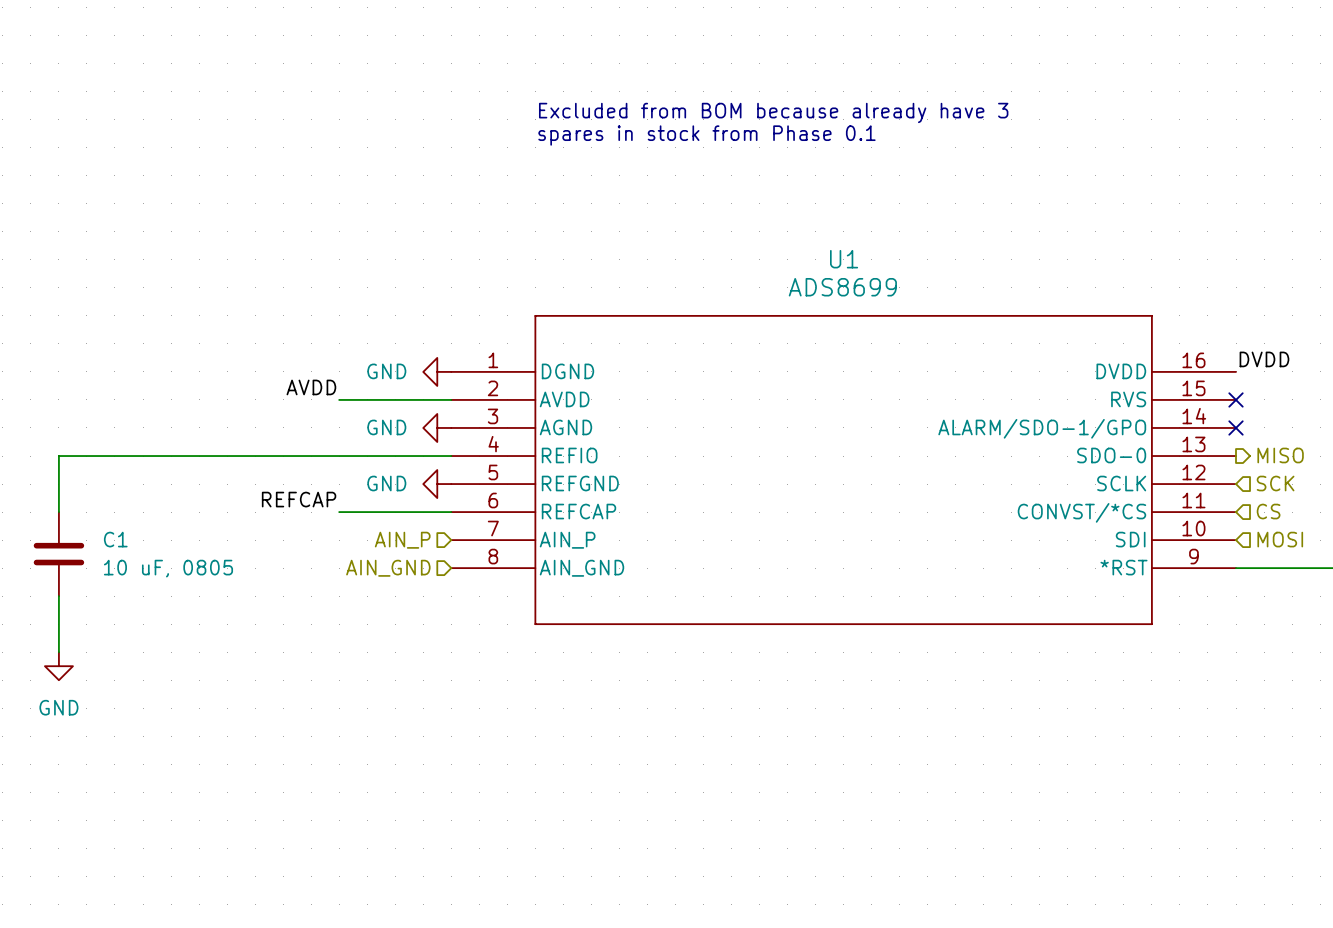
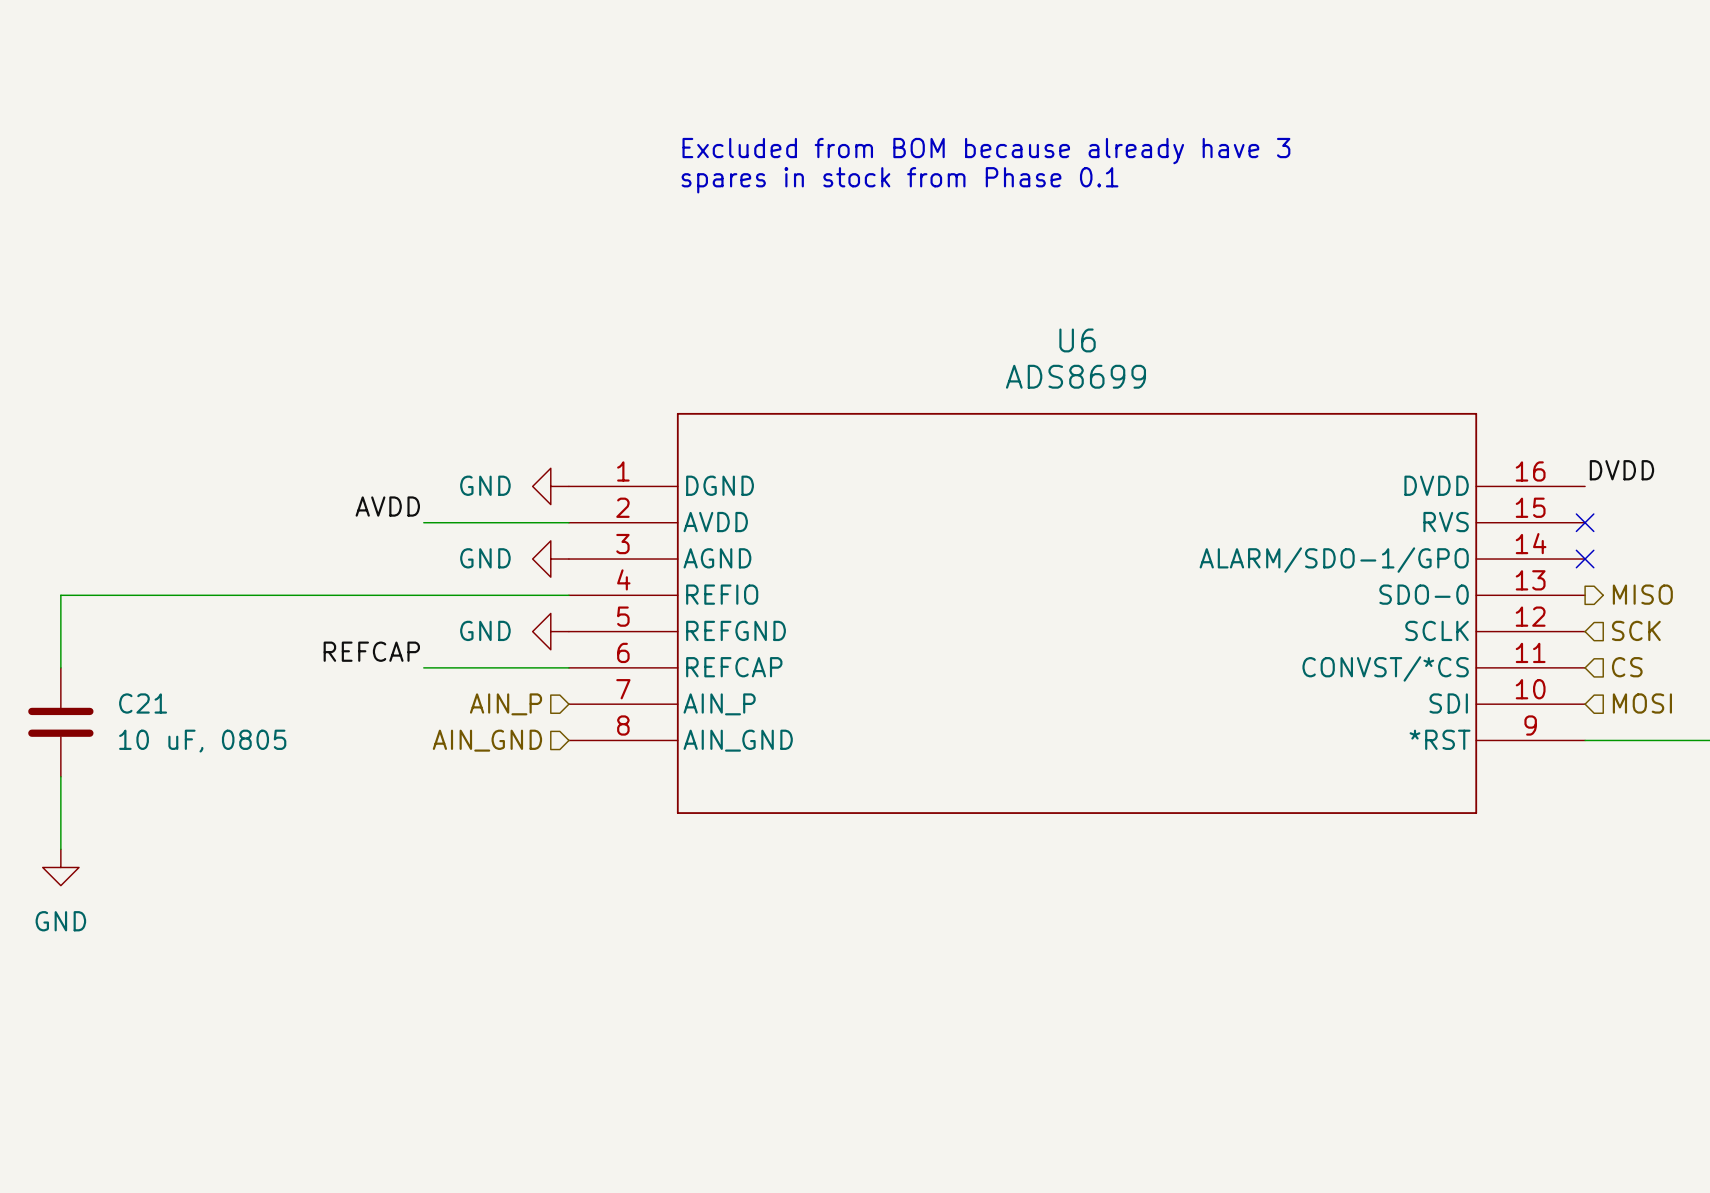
U1 name: U1 (844, 259) -> U6 (1077, 340)
C1 name: C1 (115, 539) -> C21 (143, 703)

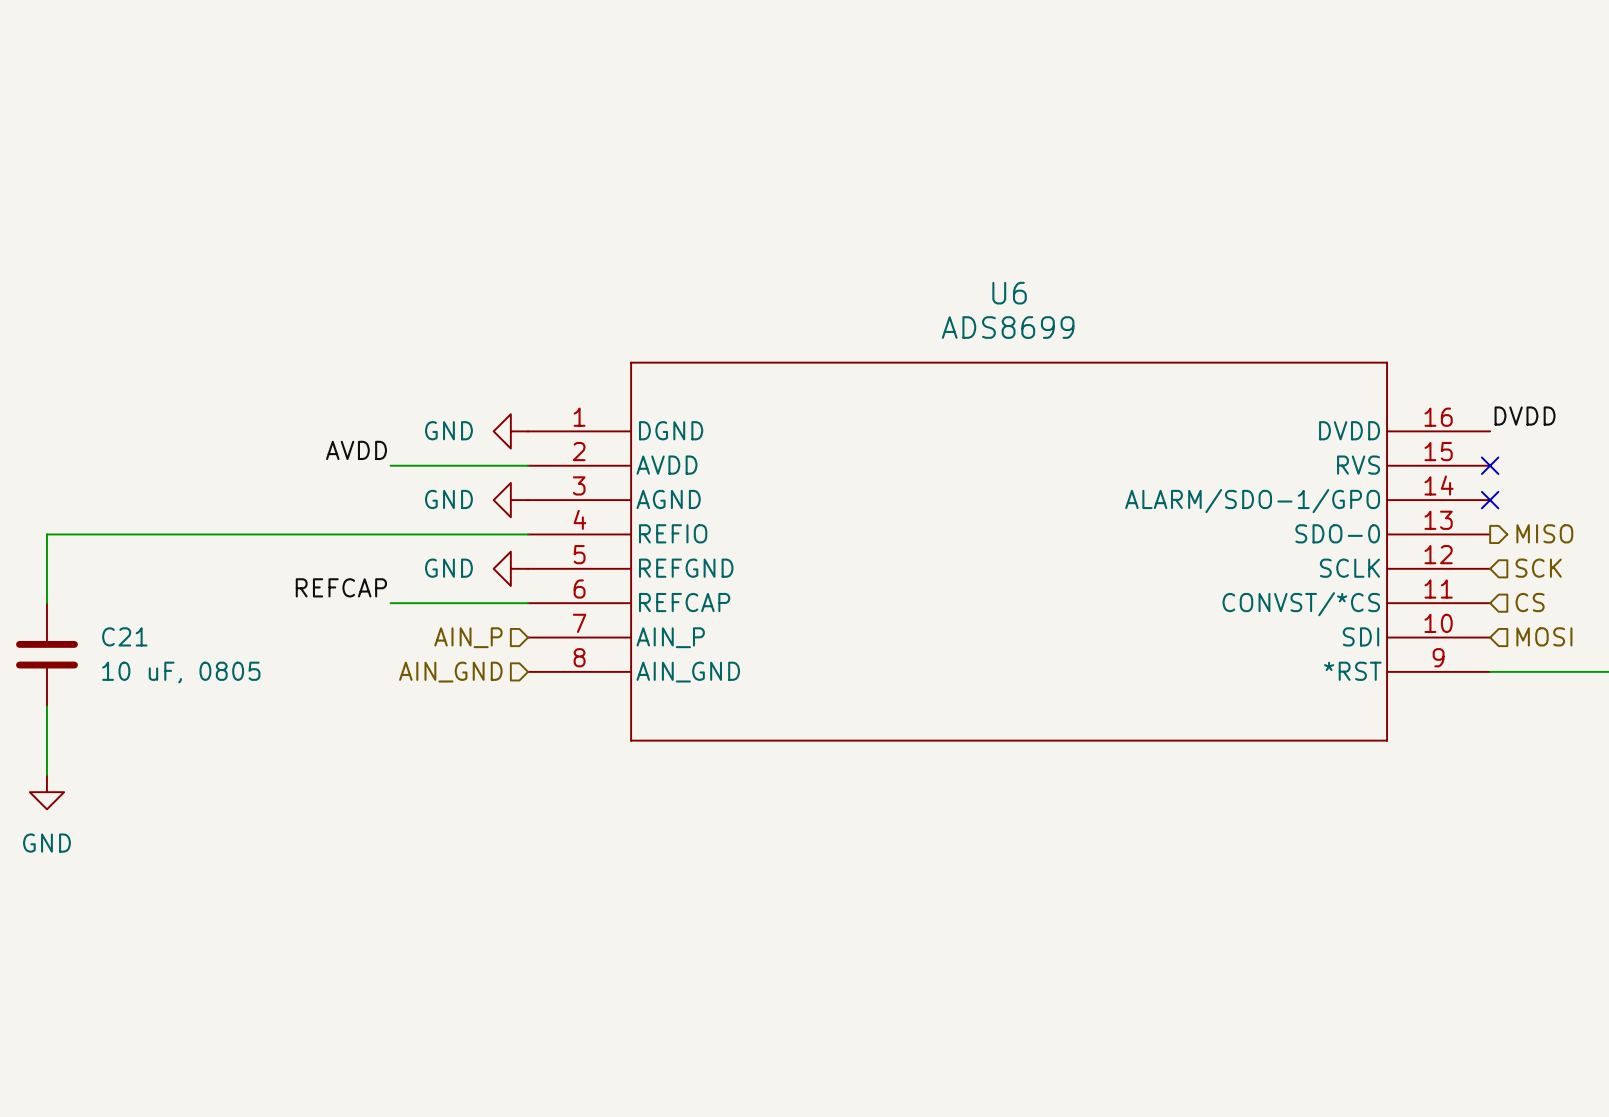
text: Excluded from BOM because already have 3 (986, 151) -> none
text: spares in stock from Phase 0.1 (900, 180) -> none

